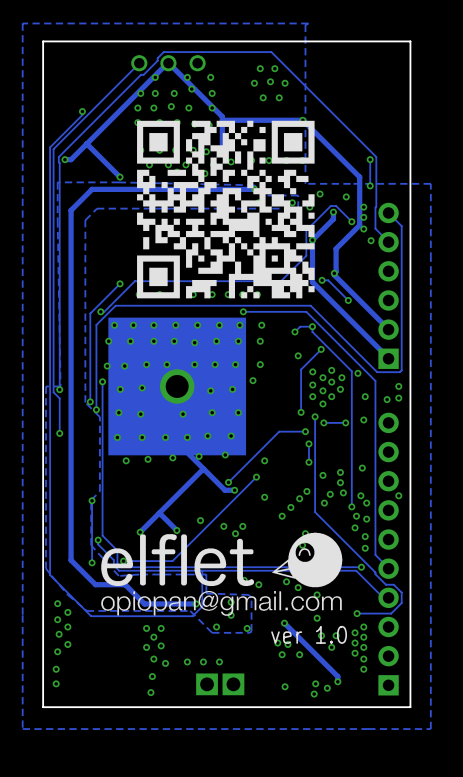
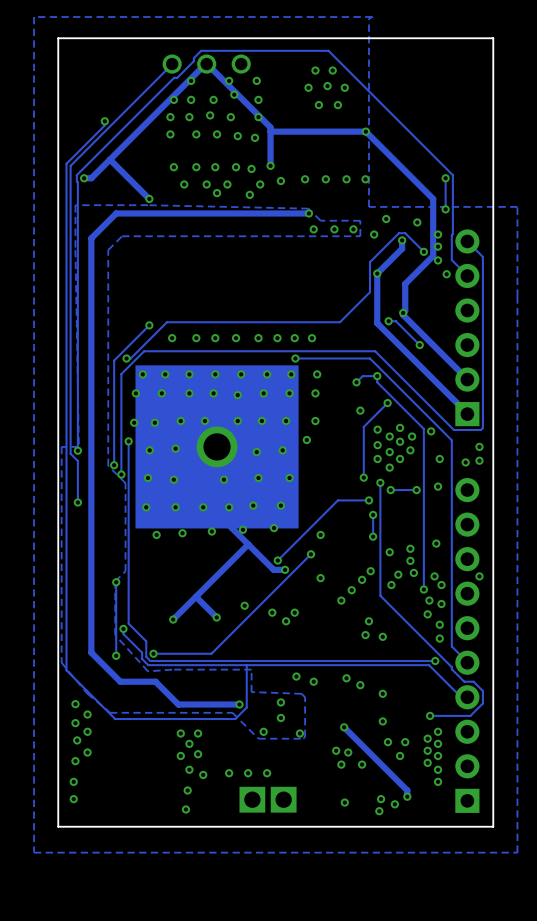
drawing: [137, 120, 315, 299] -> none
drawing: [101, 532, 343, 616] -> none
text: ver 1.0 (309, 634) -> none

